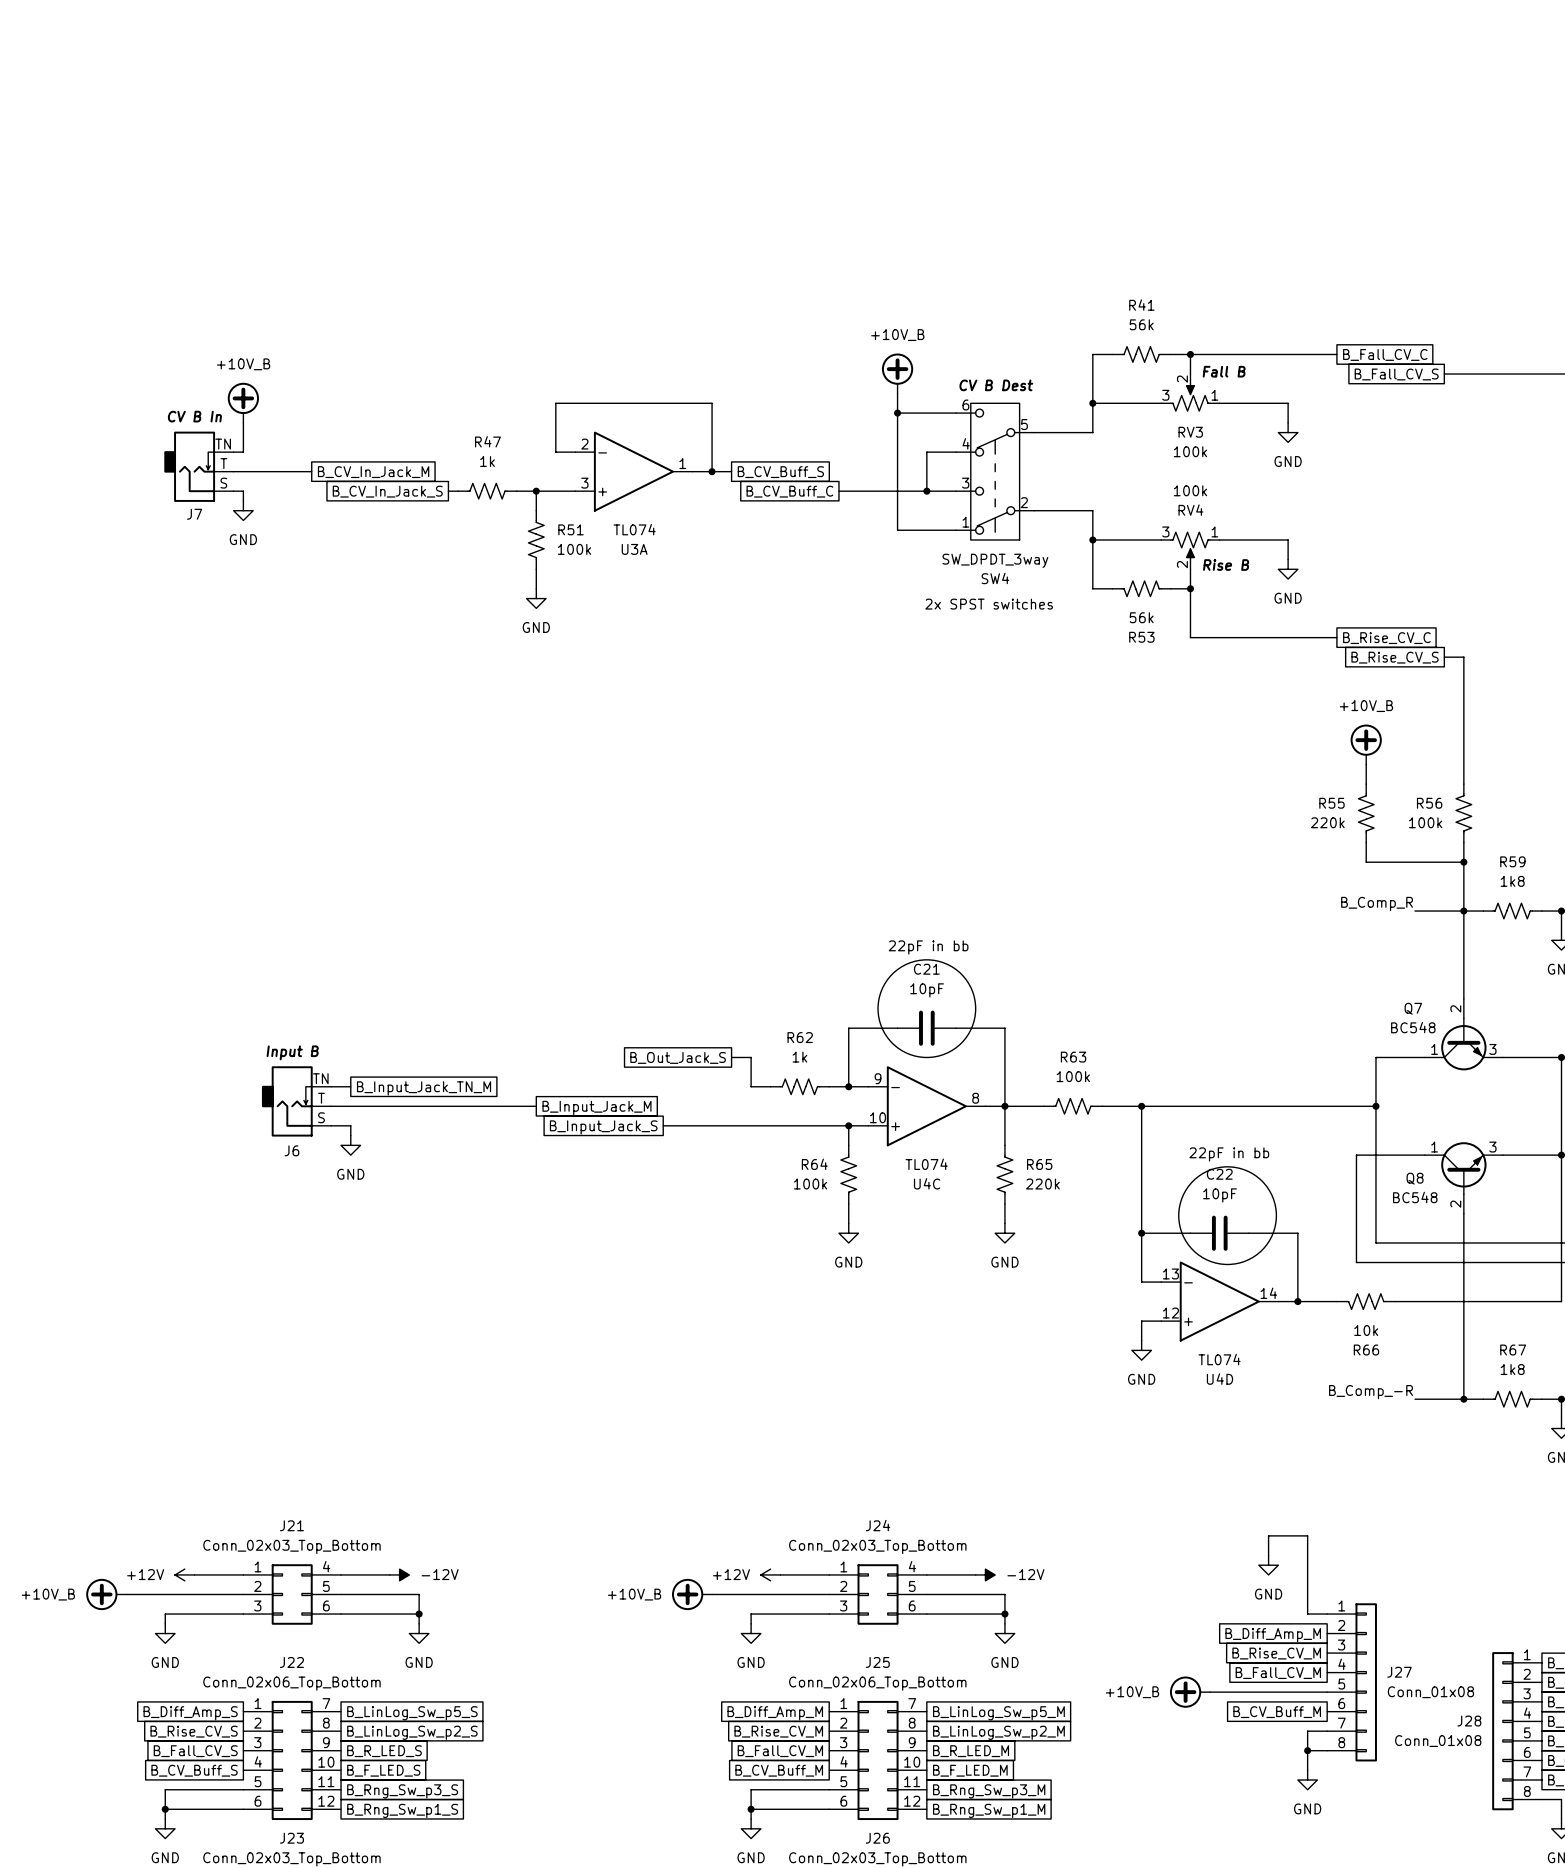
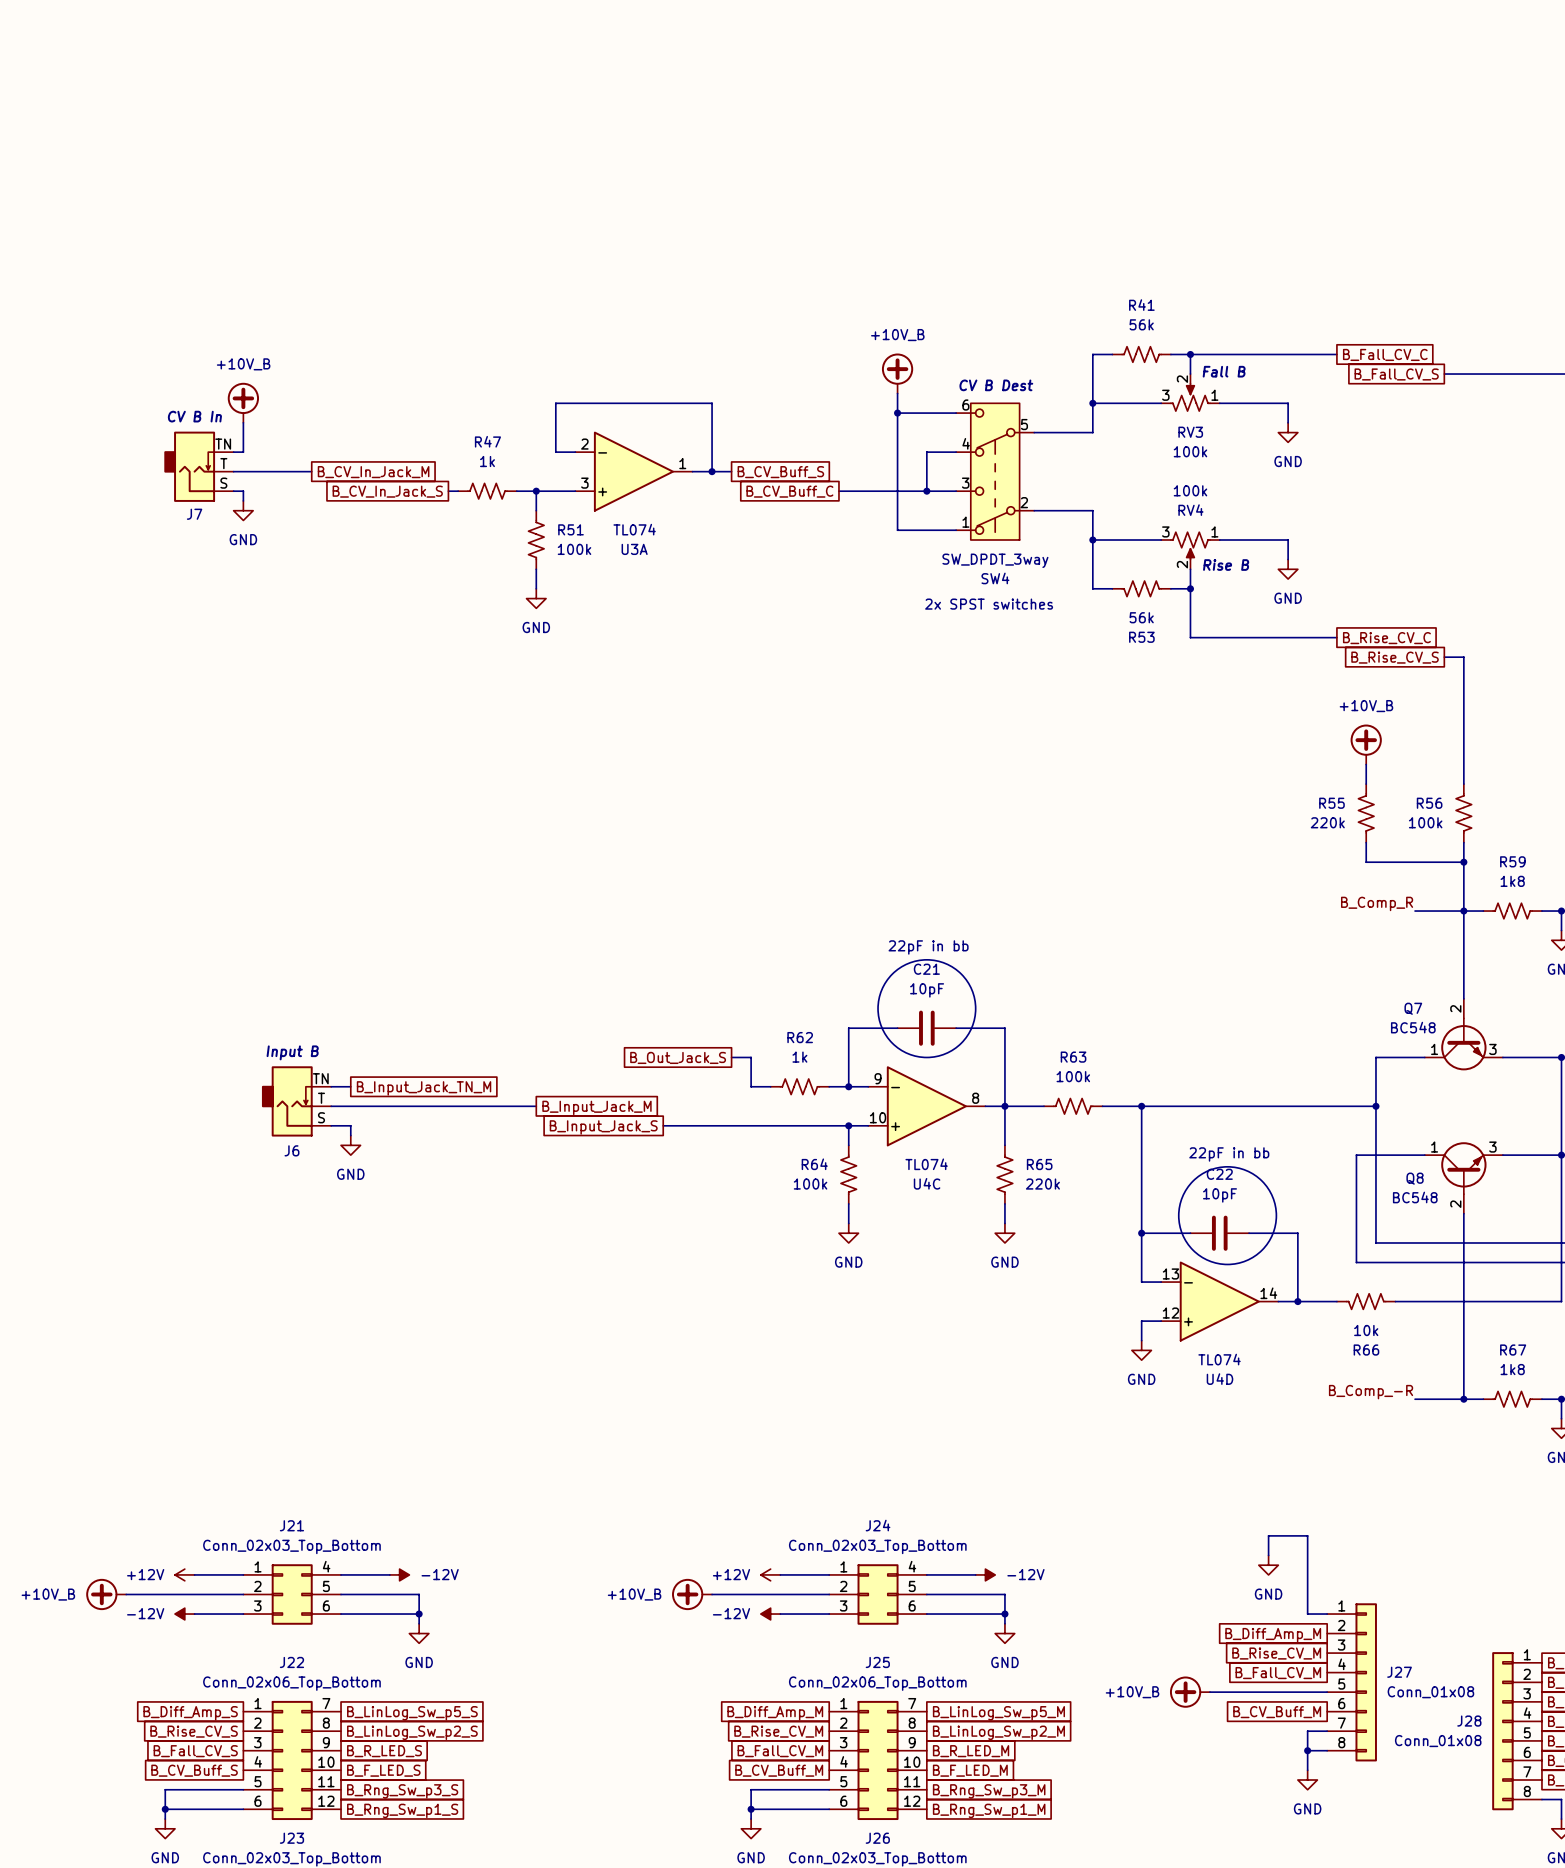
power symbol: none -> -12V (184, 1614)
wire: (194, 1614) (165, 1614) (165, 1623) -> none
power symbol: none -> -12V (770, 1614)
wire: (780, 1614) (751, 1614) (751, 1623) -> none
power symbol: GND (165, 1633) -> none
power symbol: GND (751, 1633) -> none

